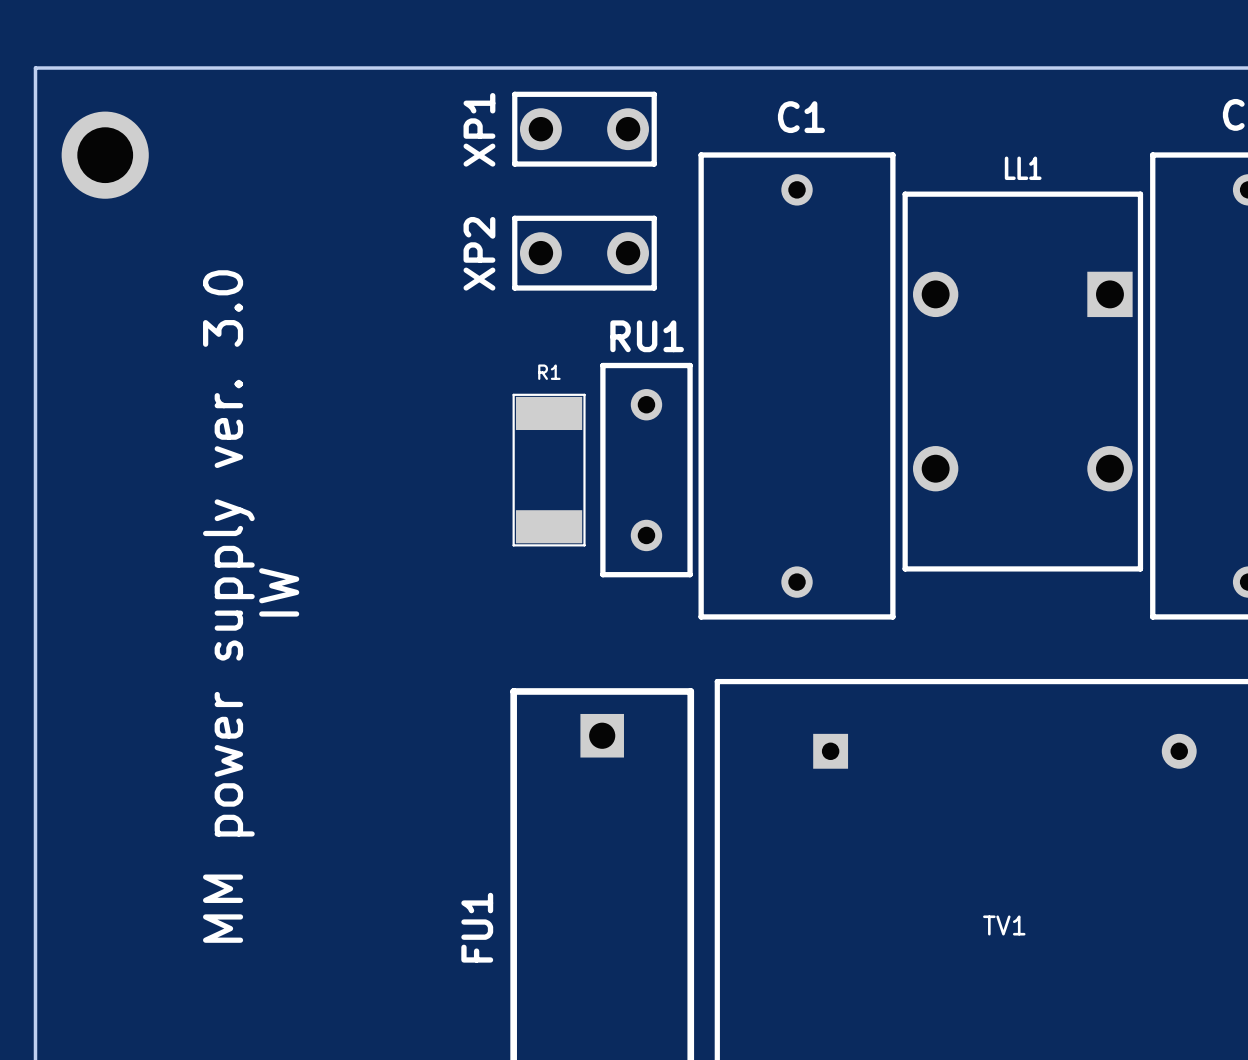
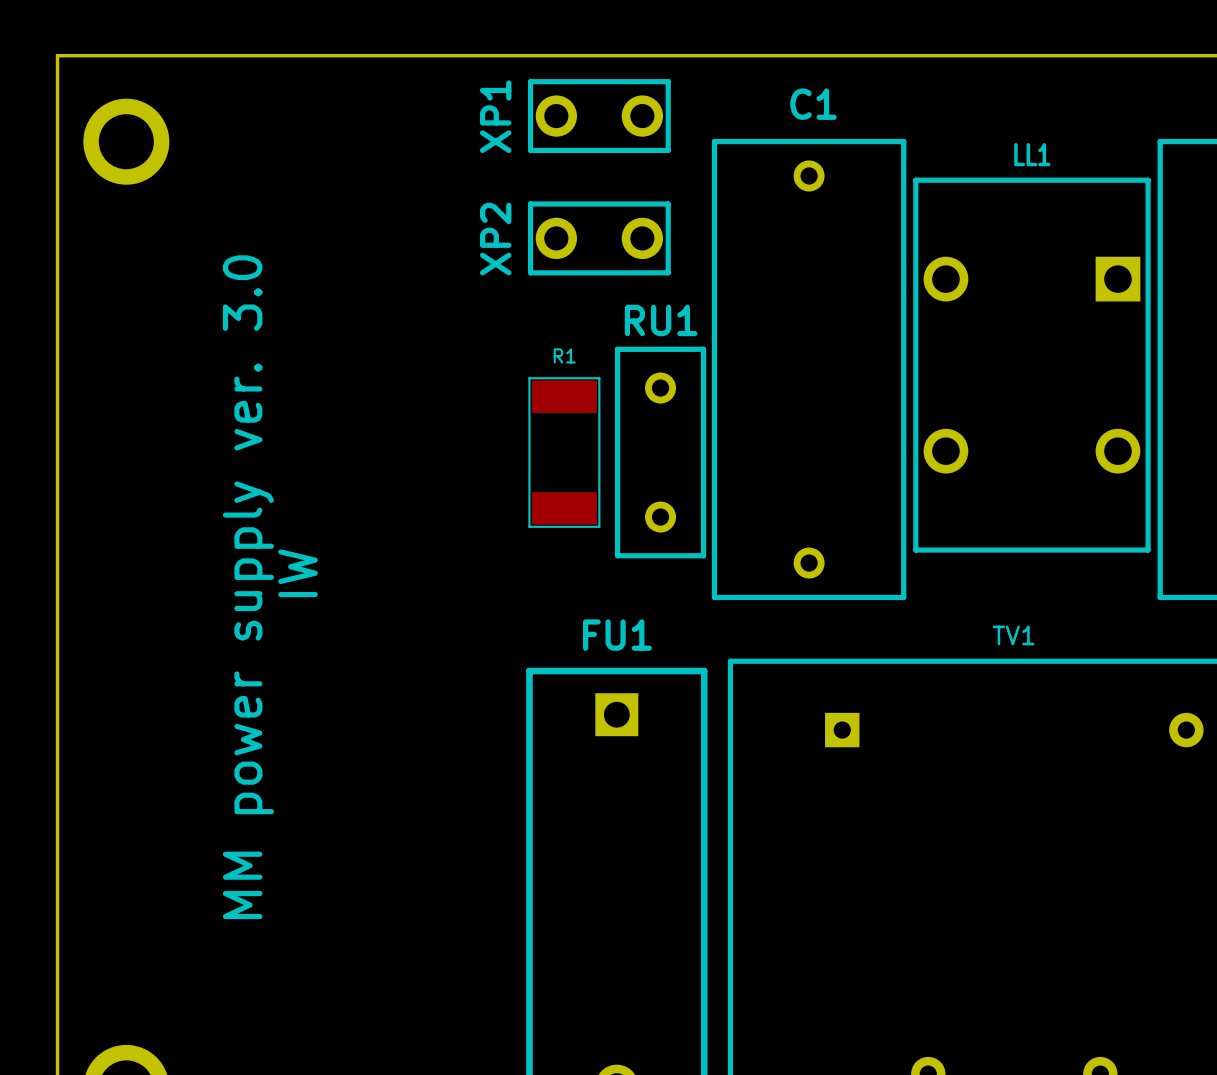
TV1 name position: TV1 (1004, 925) -> TV1 (1013, 635)
FU1 name rotation: 0° (477, 927) -> 90° clockwise (617, 635)
FU1 name position: FU1 (477, 927) -> FU1 (617, 635)

